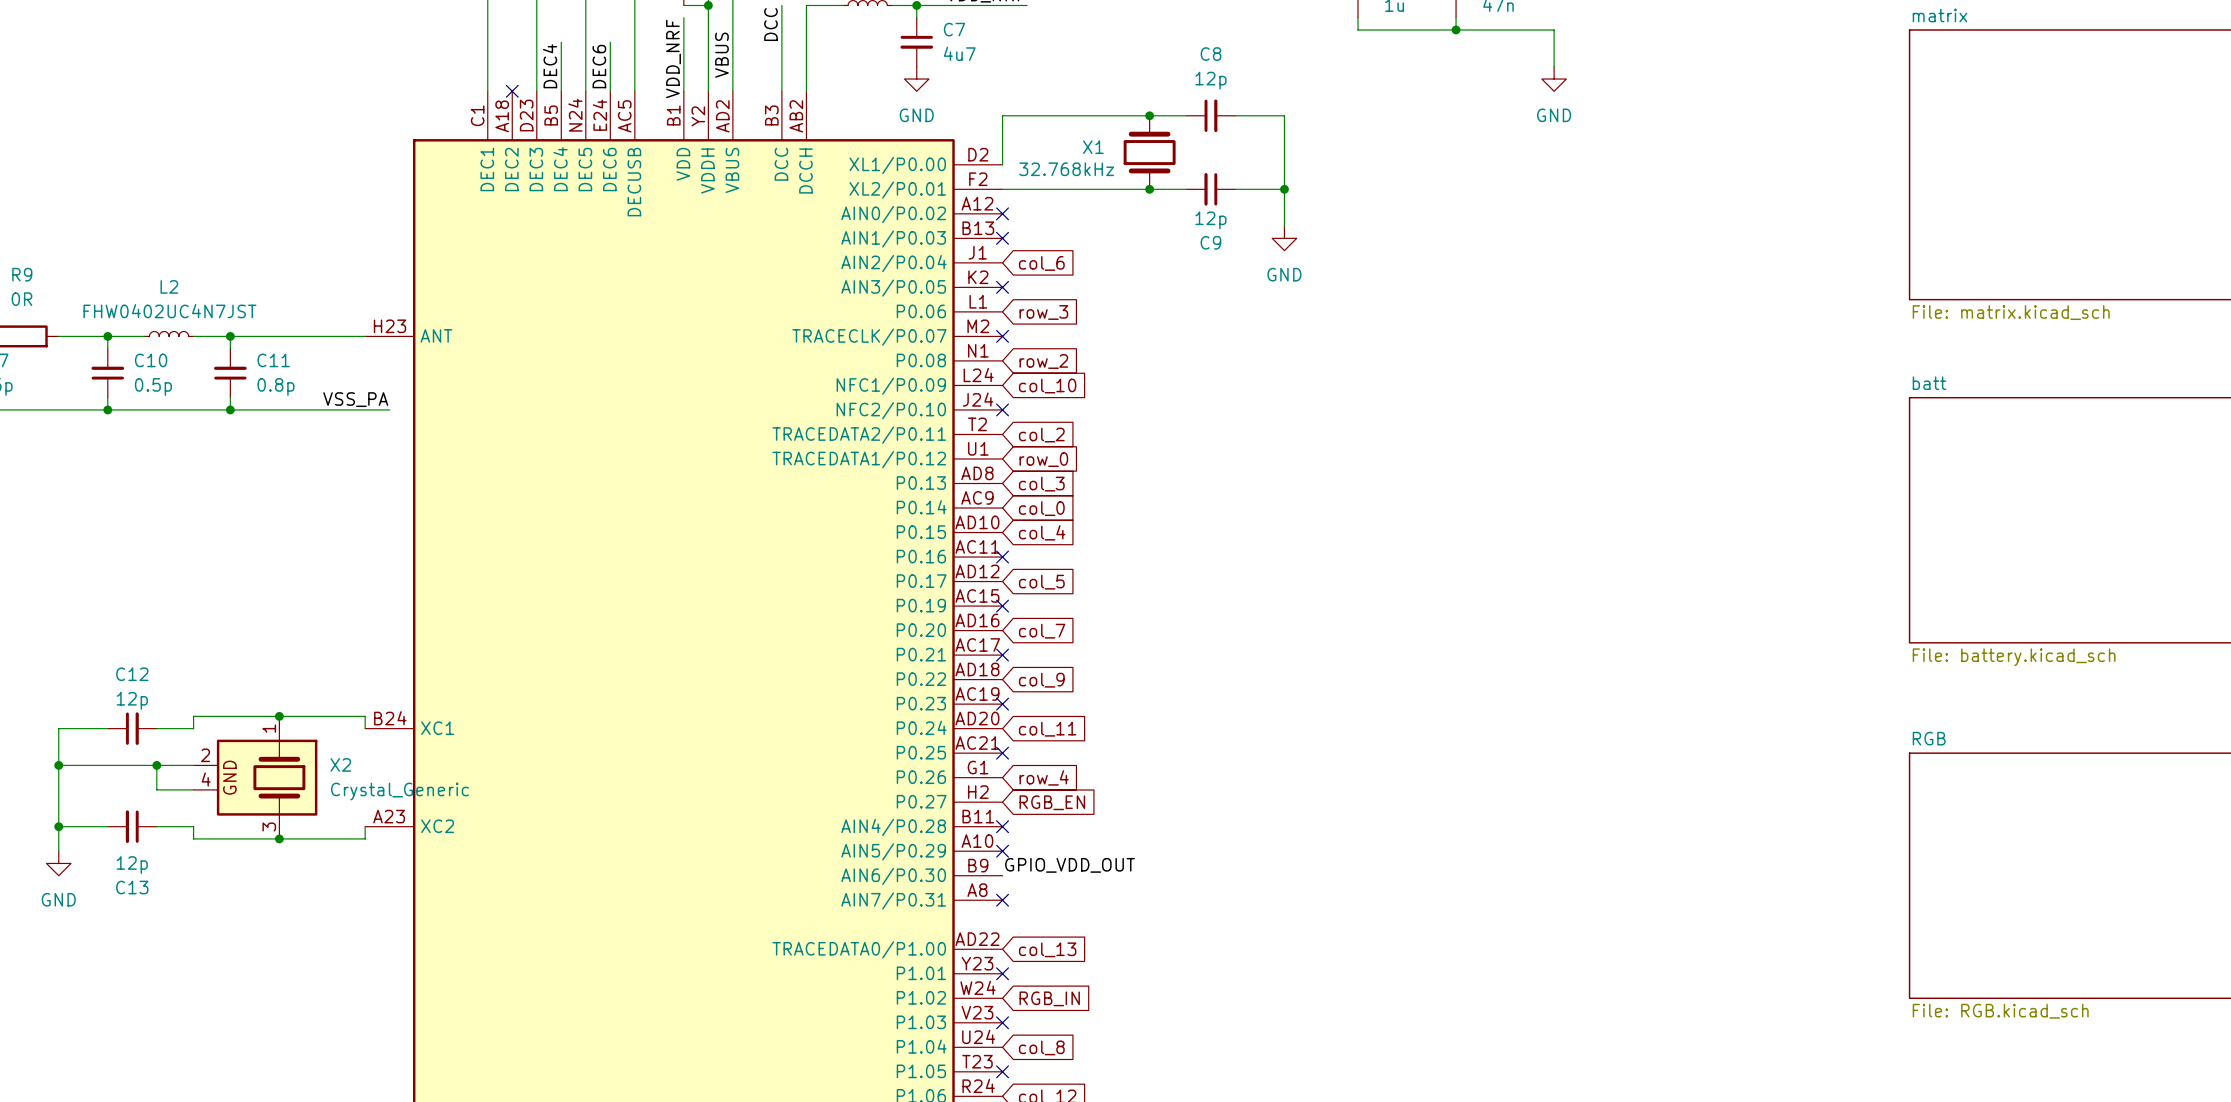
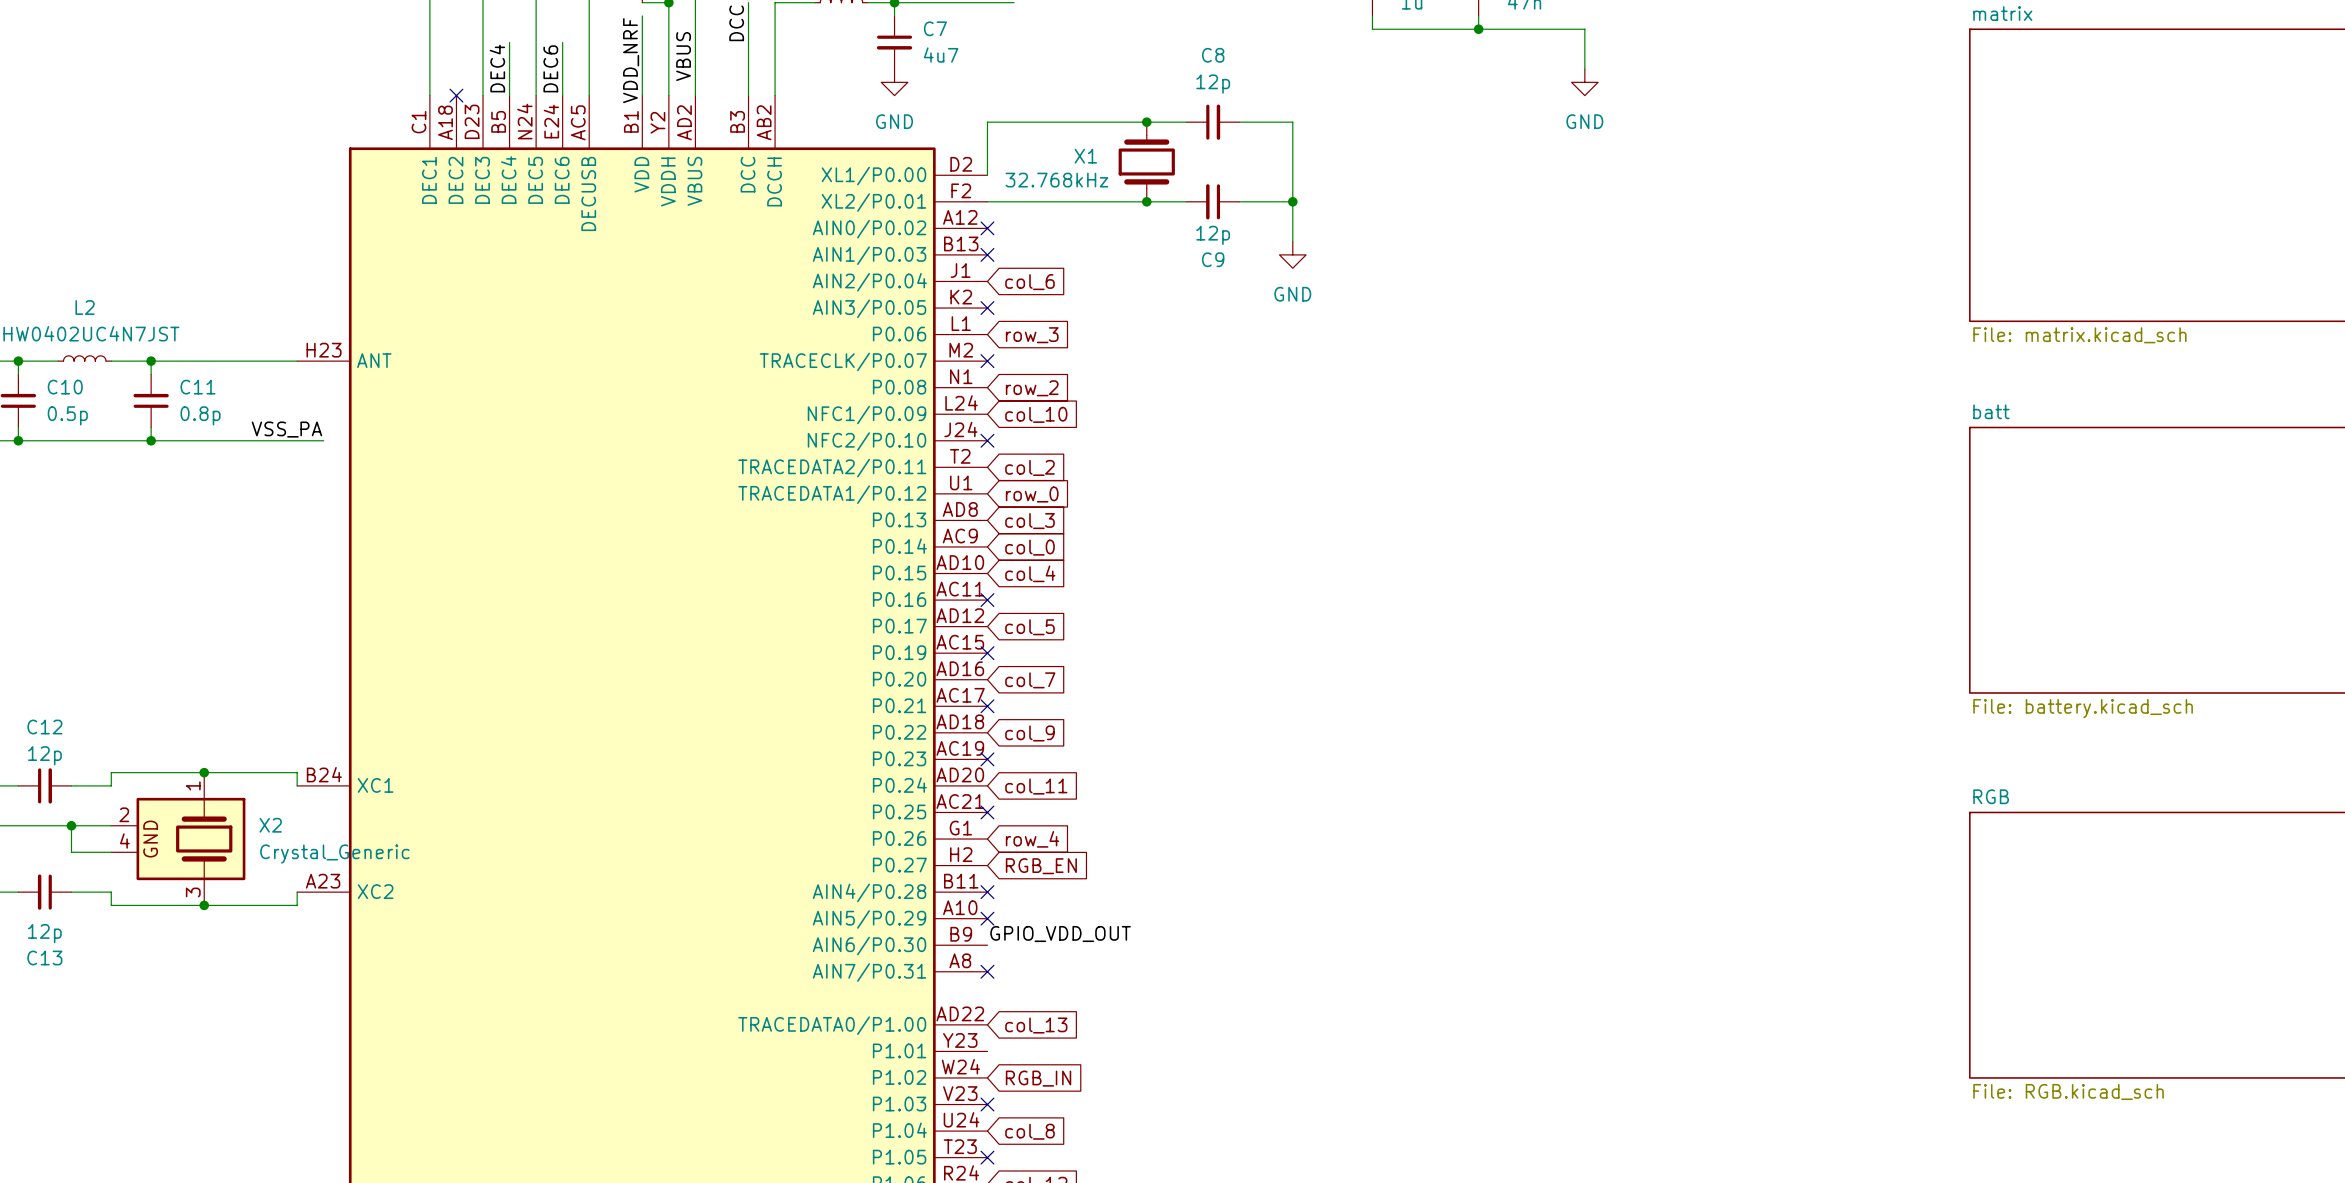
no-connect mark: (1002, 973) -> none

